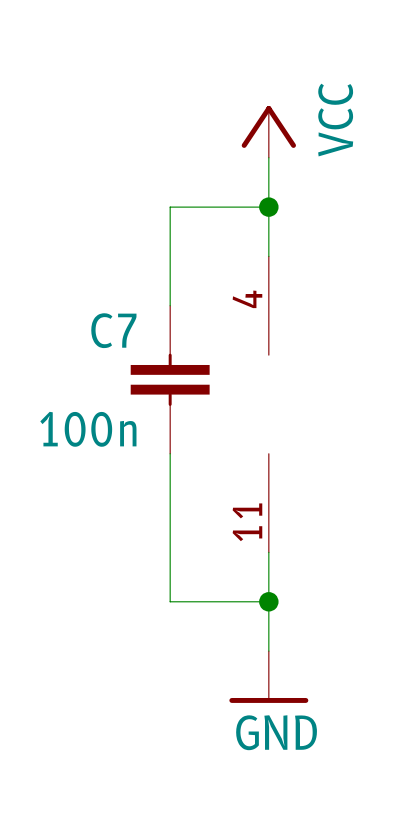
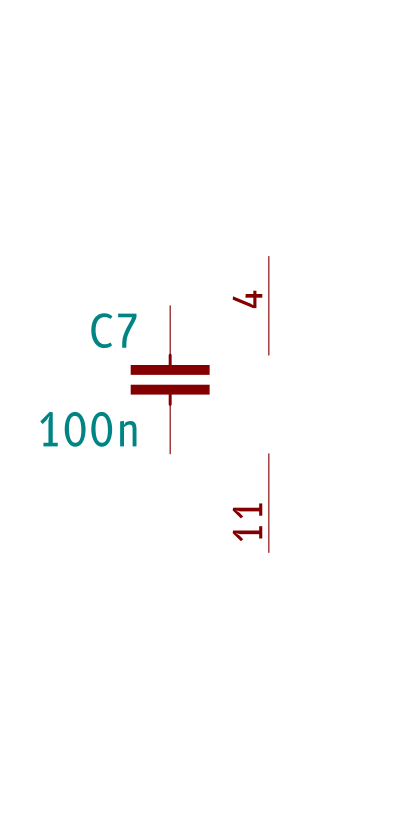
power symbol: VCC (268, 131) -> none
wire: (268, 157) (268, 256) -> none
wire: (268, 207) (170, 207) (170, 305) -> none
junction: (268, 207) -> none
wire: (170, 453) (170, 601) (268, 601) -> none
wire: (268, 552) (268, 651) -> none
junction: (268, 601) -> none
power symbol: GND (268, 677) -> none

